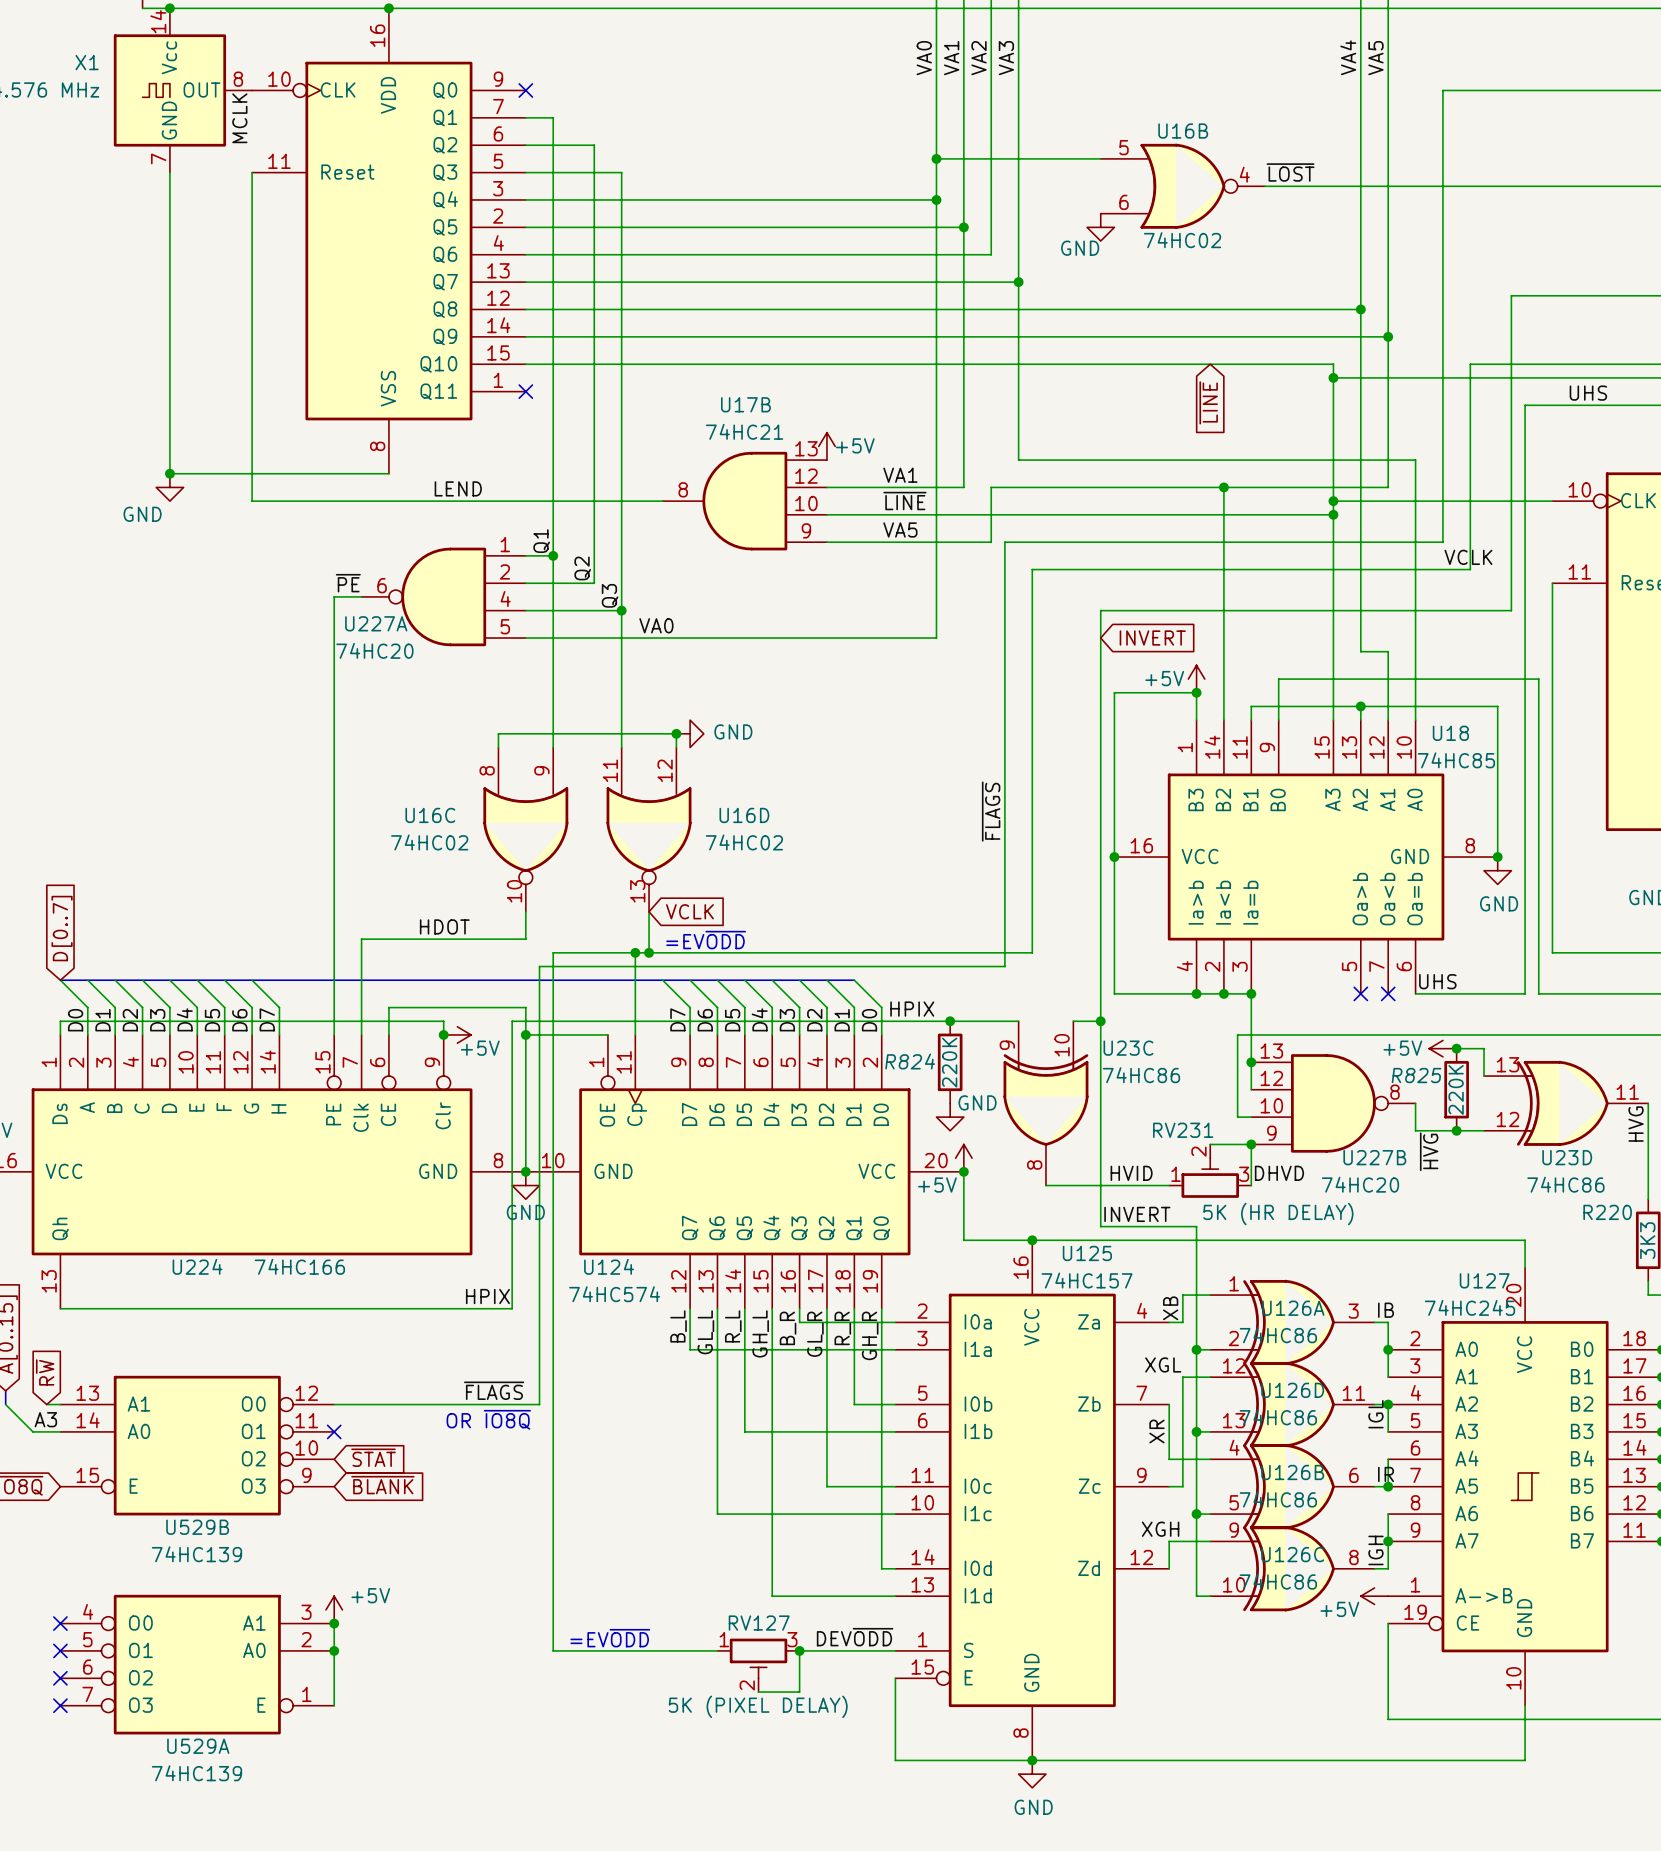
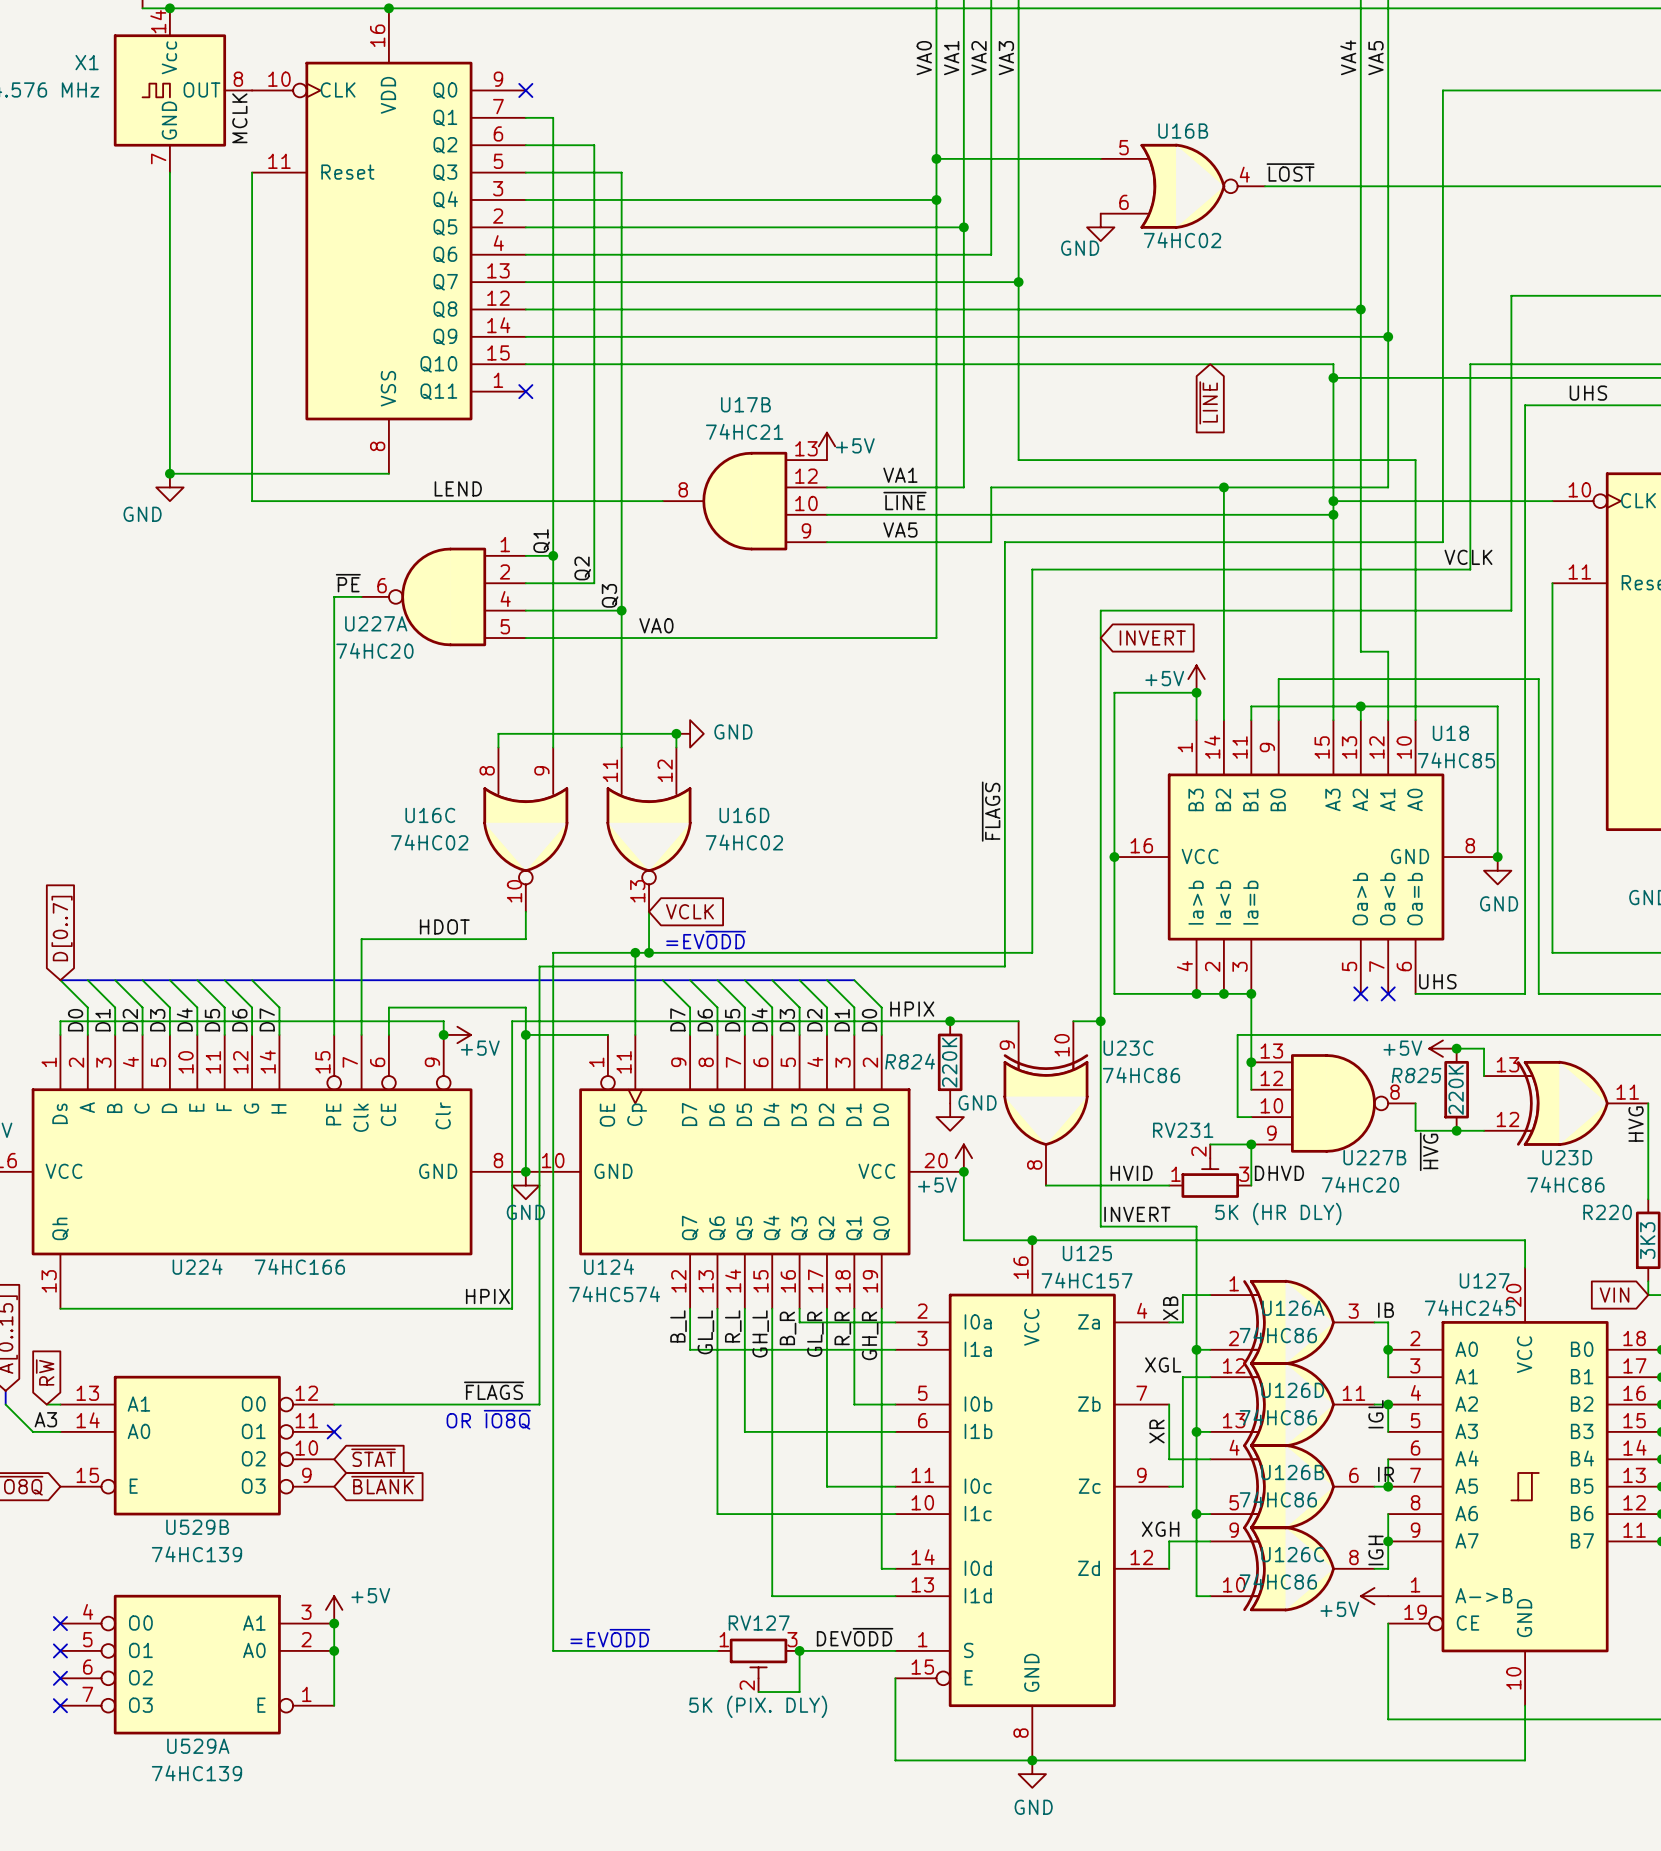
RV231 value: 5K (HR DELAY) (1278, 1214) -> 5K (HR DLY) (1278, 1214)
global label: none -> VIN (1614, 1295)
RV127 value: 5K (PIXEL DELAY) (758, 1706) -> 5K (PIX. DLY) (758, 1706)

